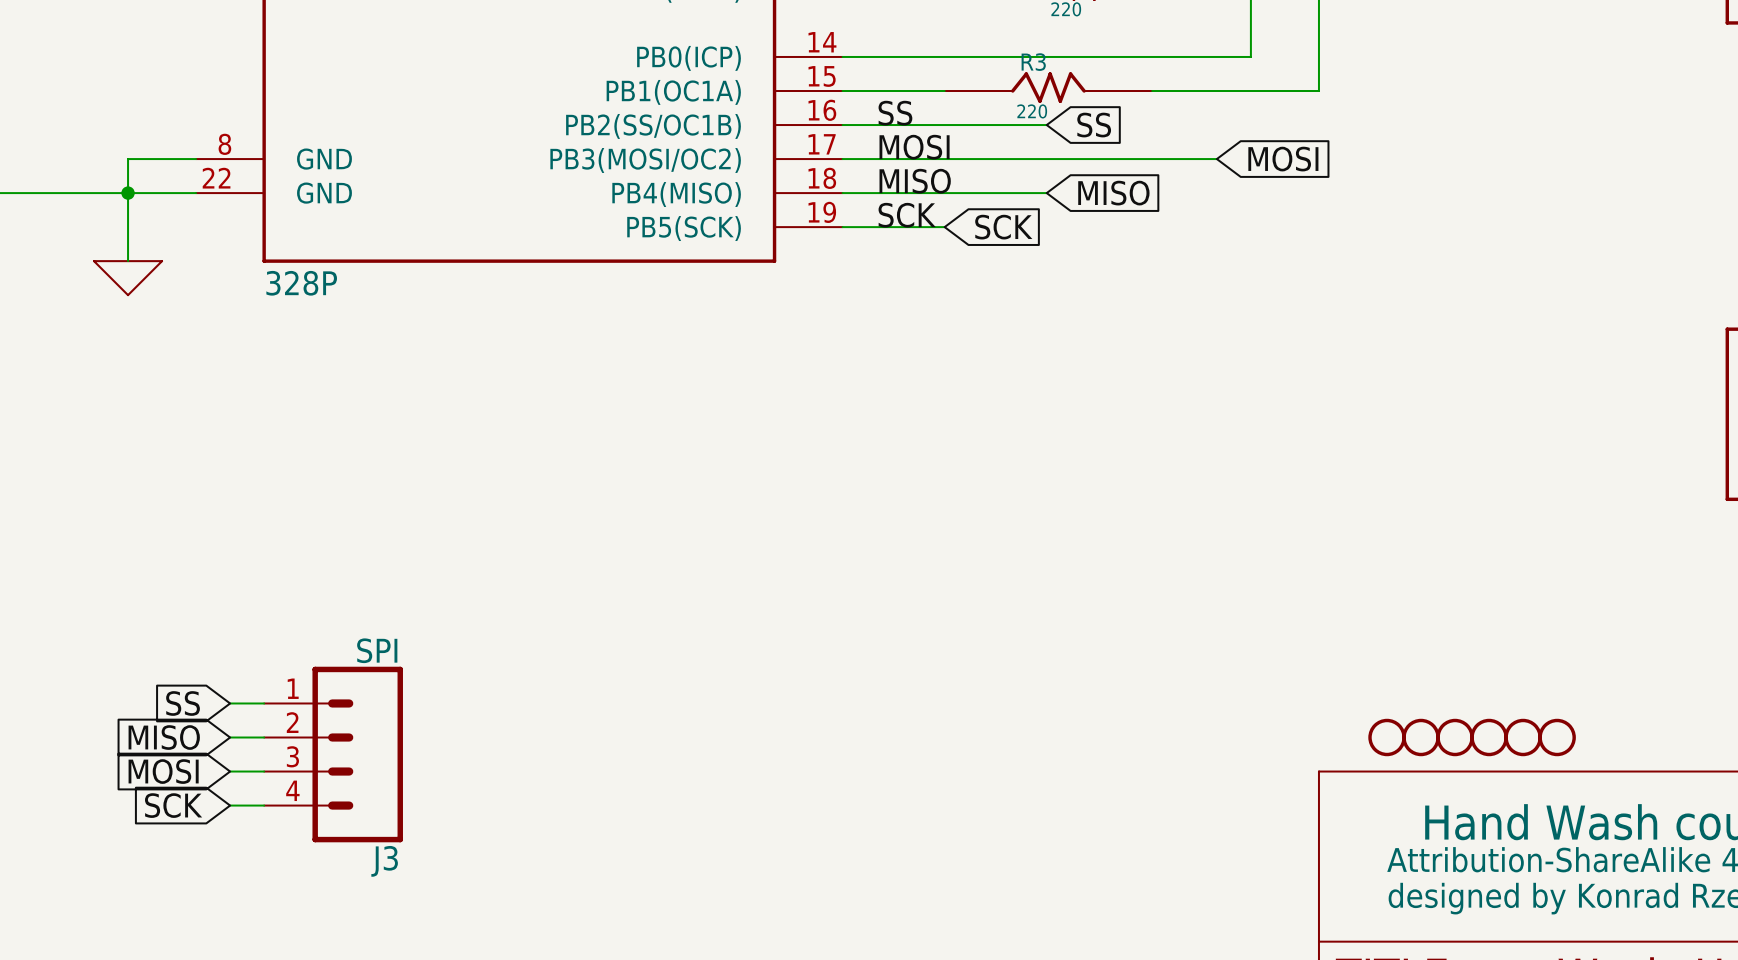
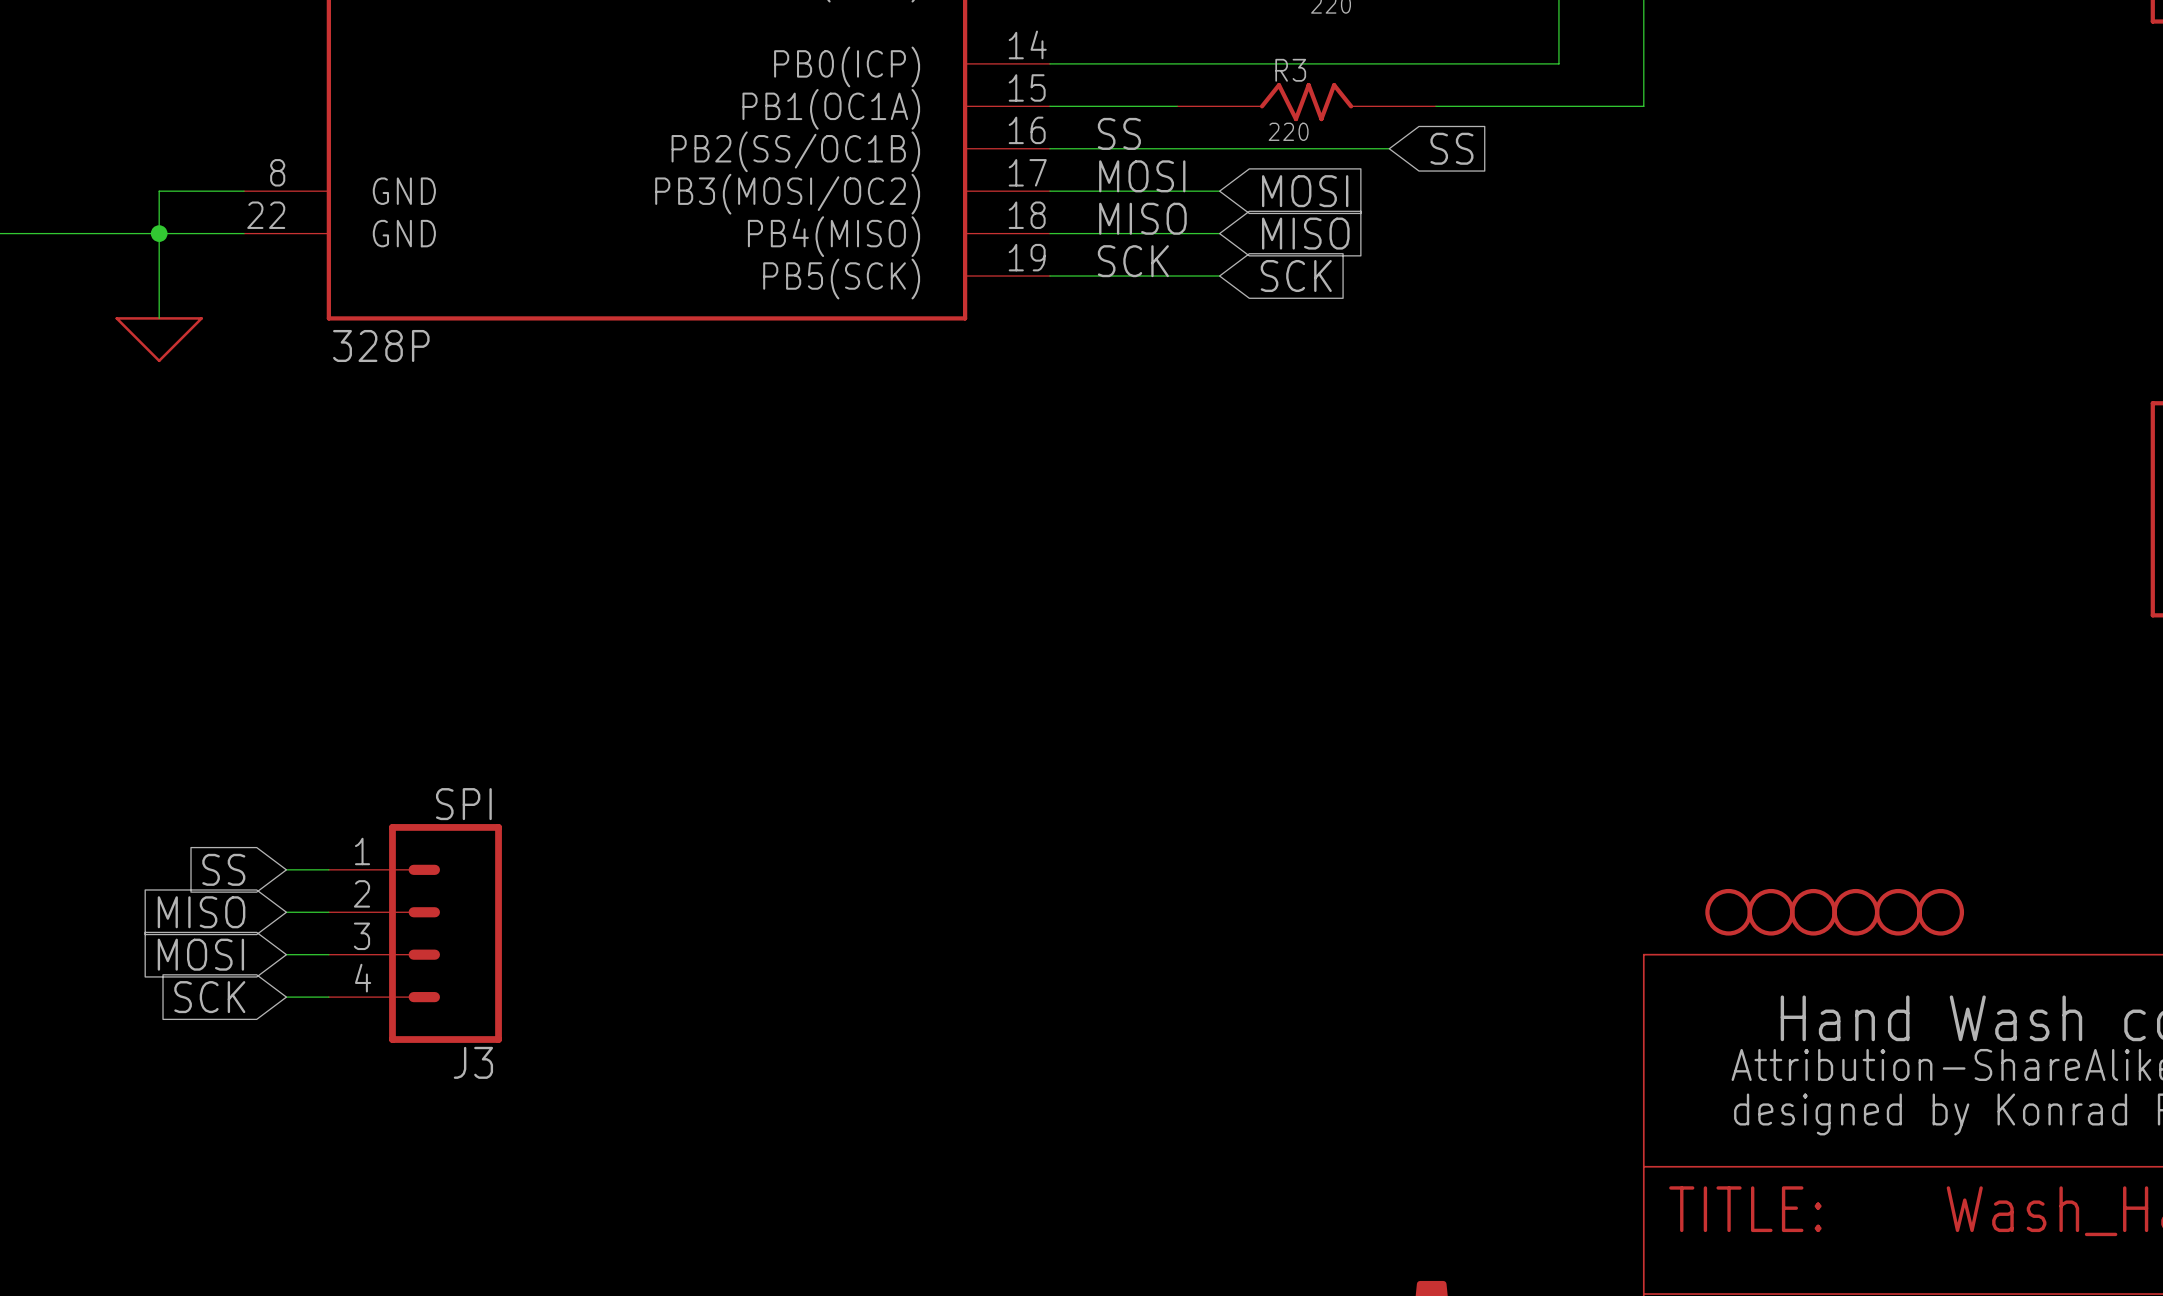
global label position: SS (1094, 125) -> SS (1451, 148)
wire: (978, 159) (1216, 159) -> none
global label position: MOSI (1283, 159) -> MOSI (1305, 191)
wire: (978, 193) (1046, 193) -> (1304, 148) (1389, 148)
global label position: MISO (1113, 193) -> MISO (1305, 233)
wire: none -> (1177, 276) (1219, 276)
global label position: SCK (1003, 227) -> SCK (1296, 276)

